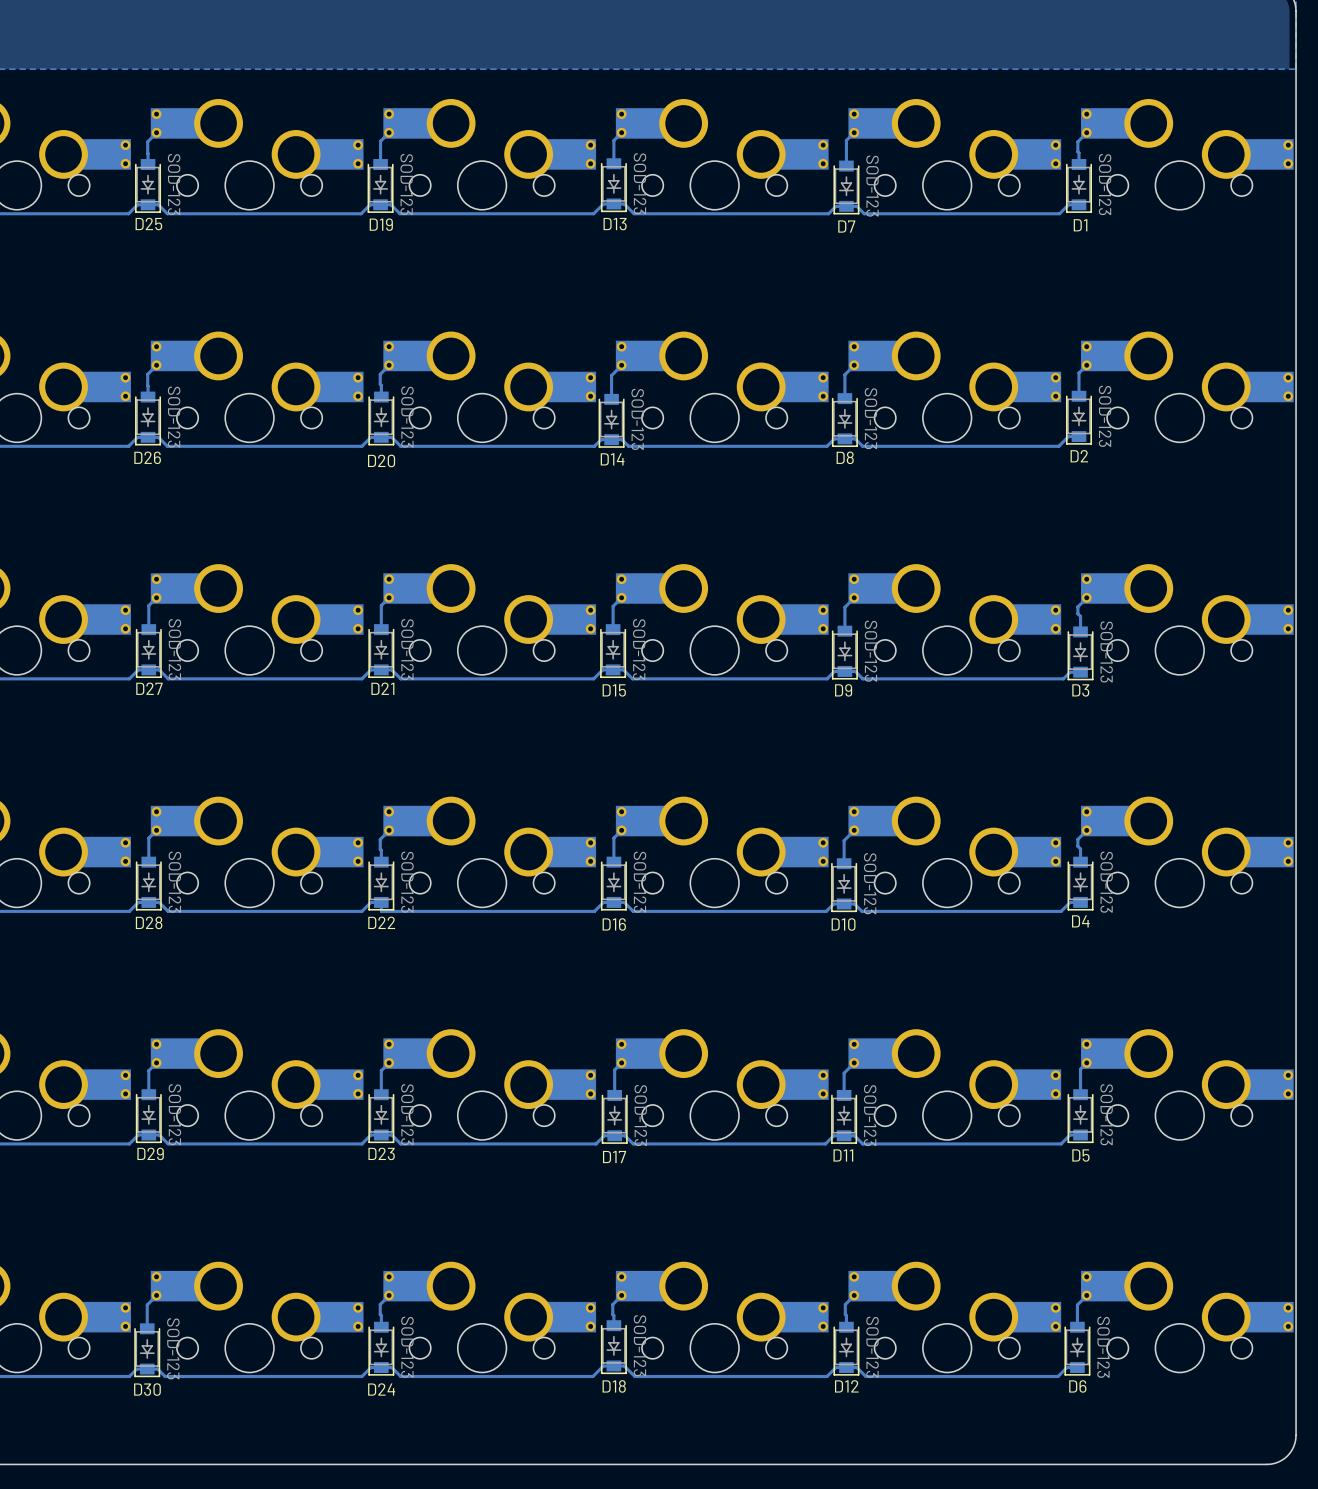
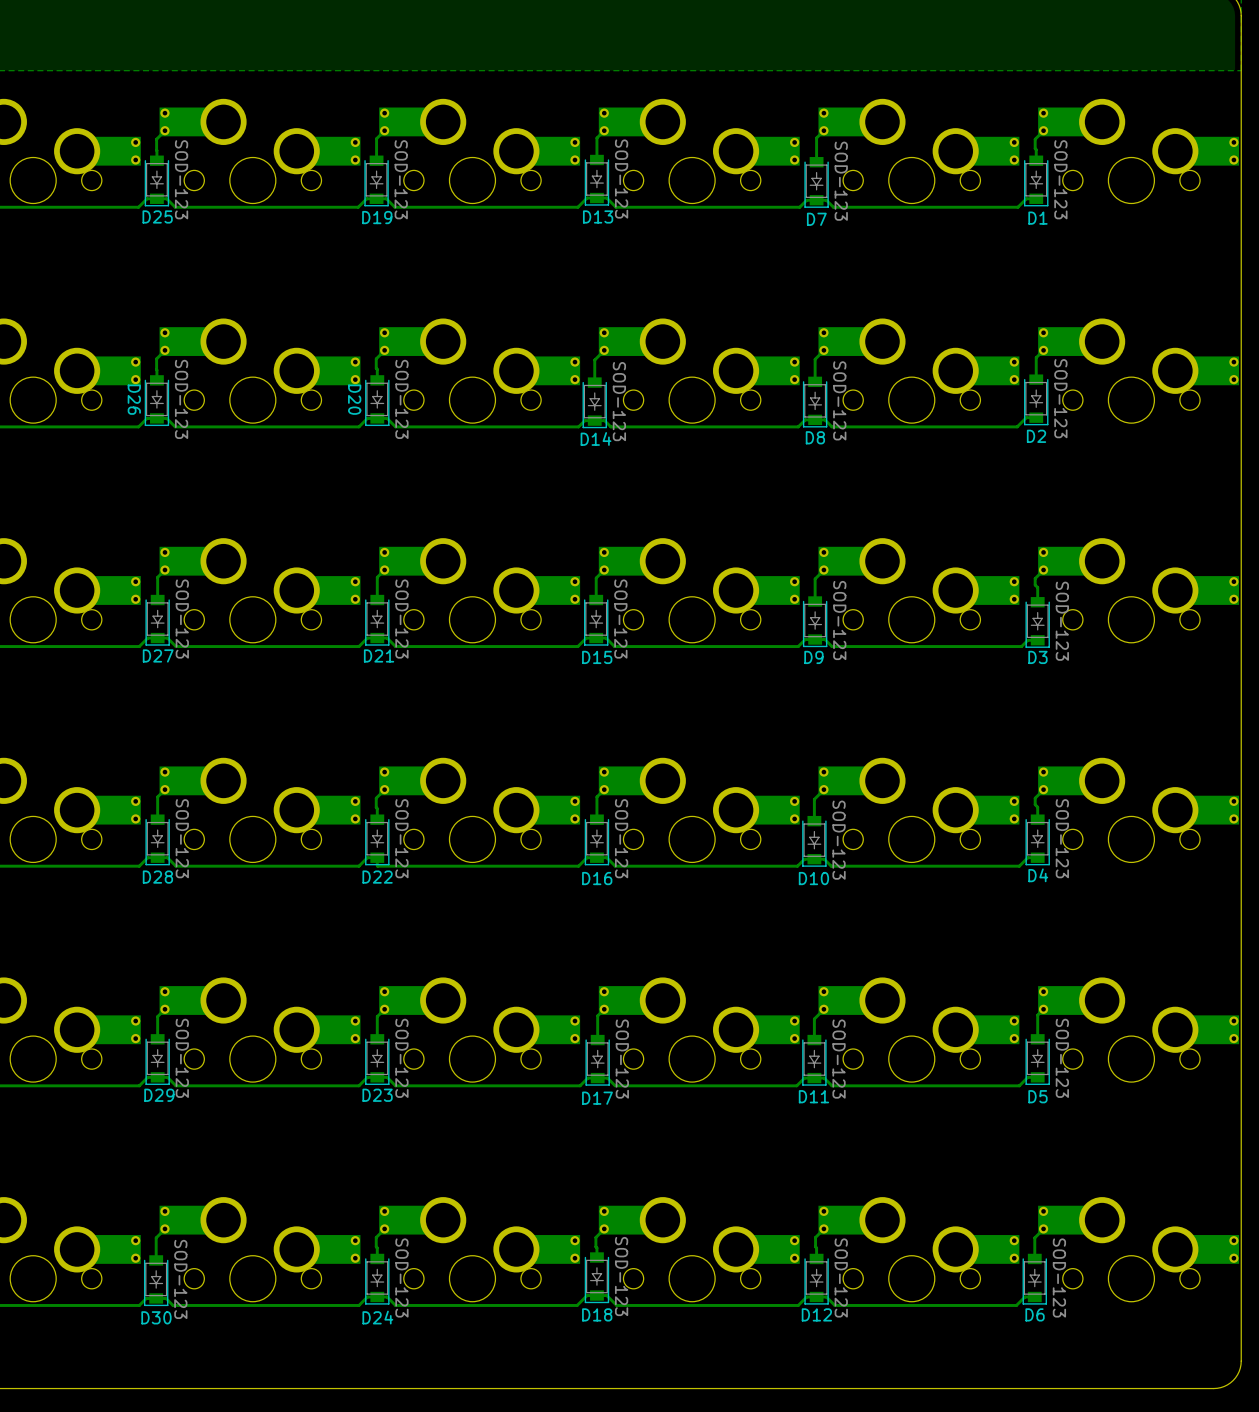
D26 name rotation: 0° (147, 457) -> 90° clockwise (134, 399)
D26 name position: D26 (147, 457) -> D26 (134, 399)
D20 name rotation: 0° (381, 460) -> 90° clockwise (354, 399)
D20 name position: D20 (381, 460) -> D20 (354, 399)

